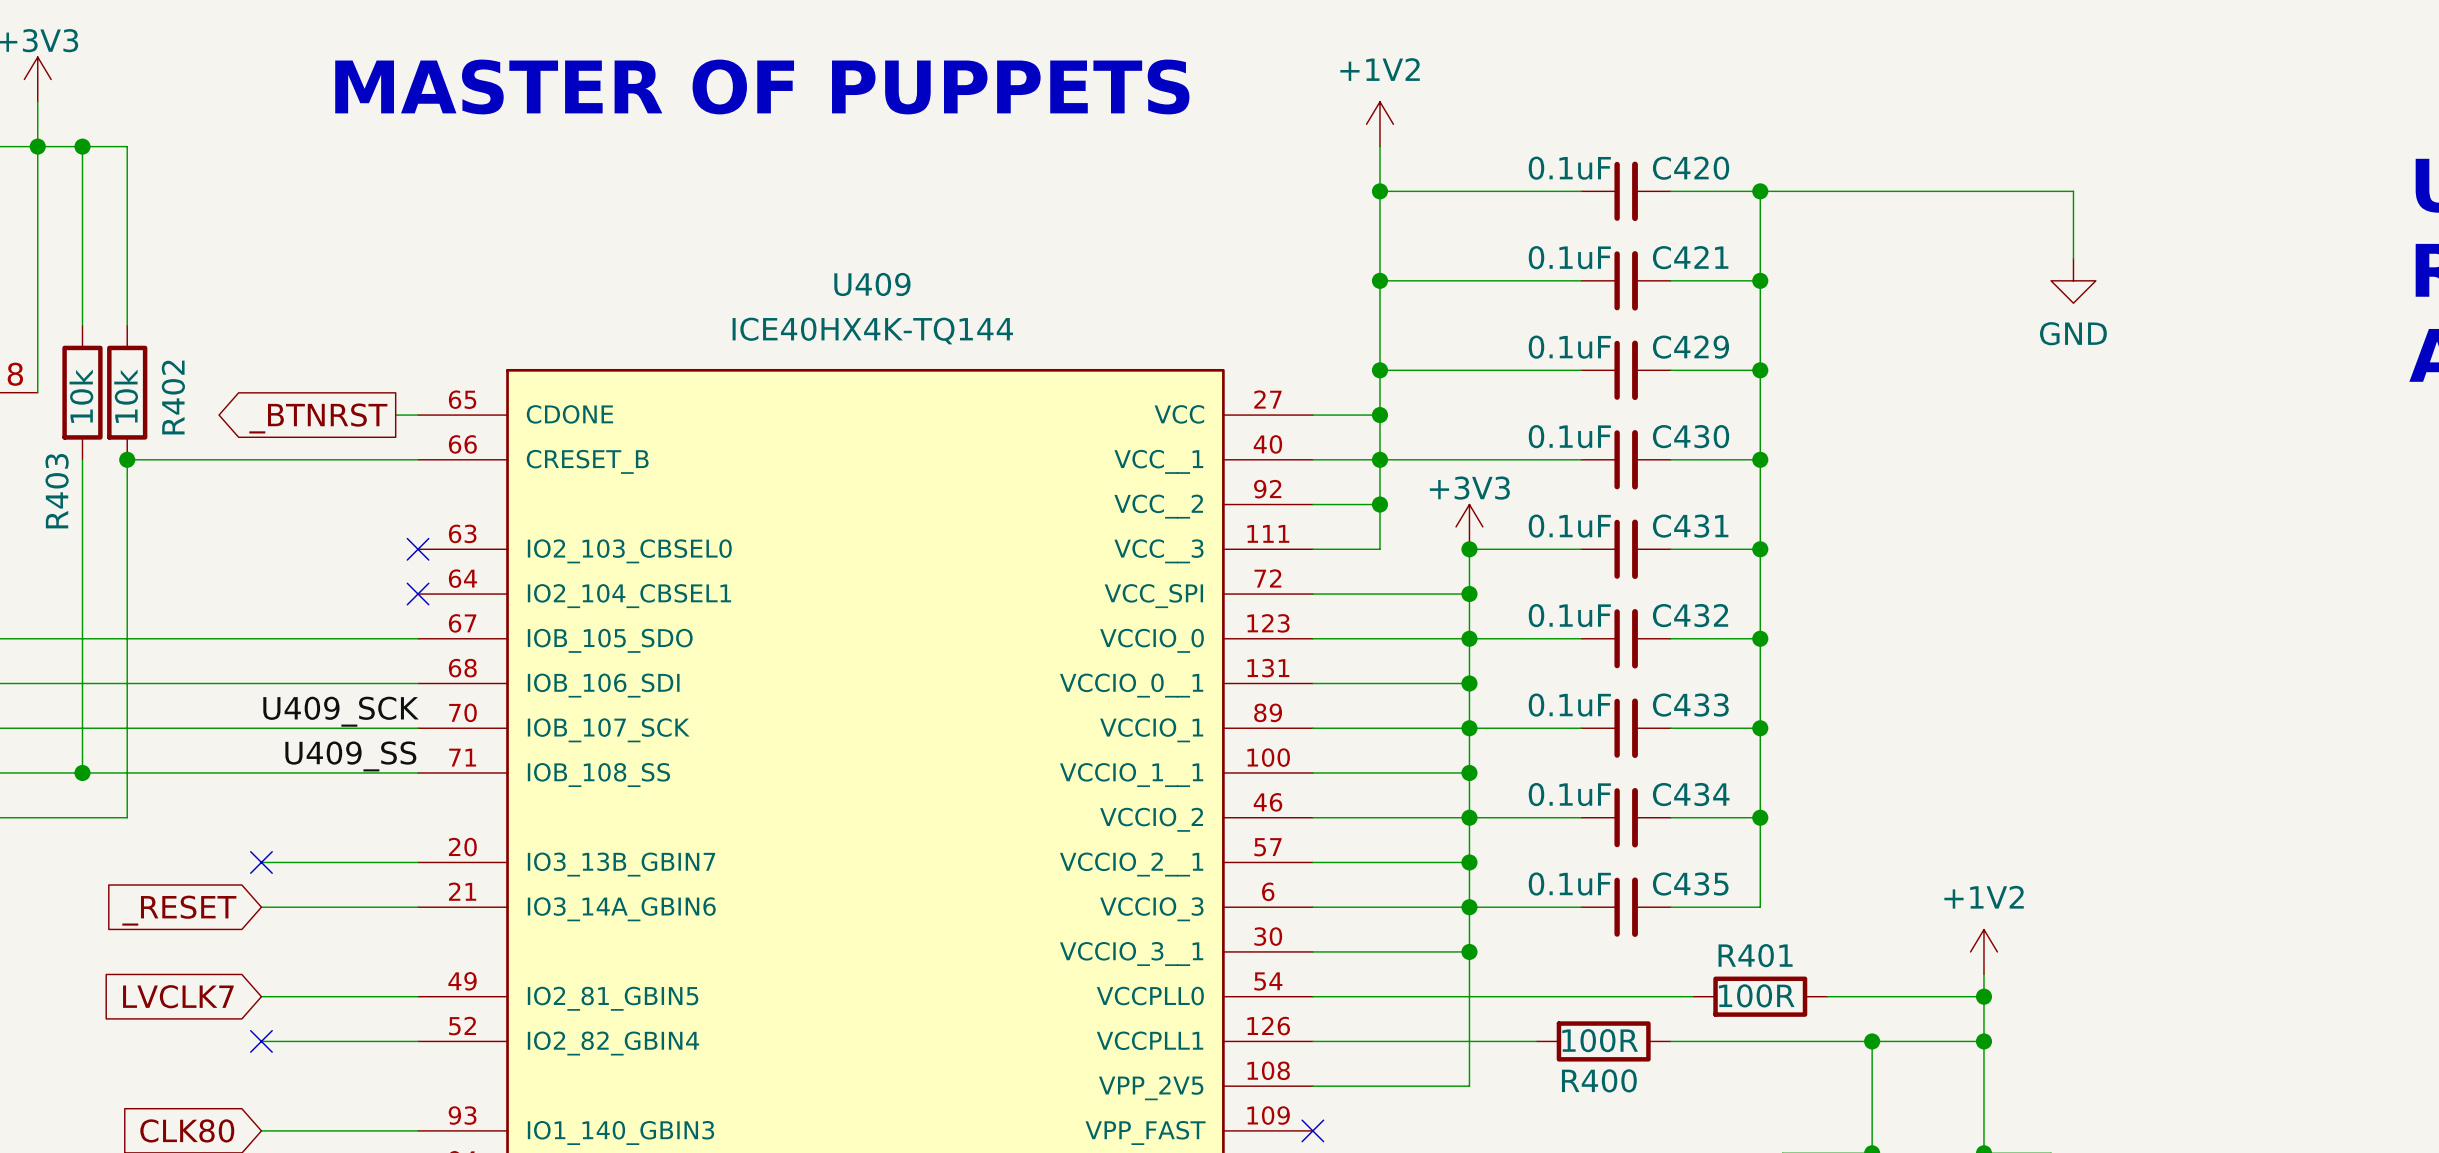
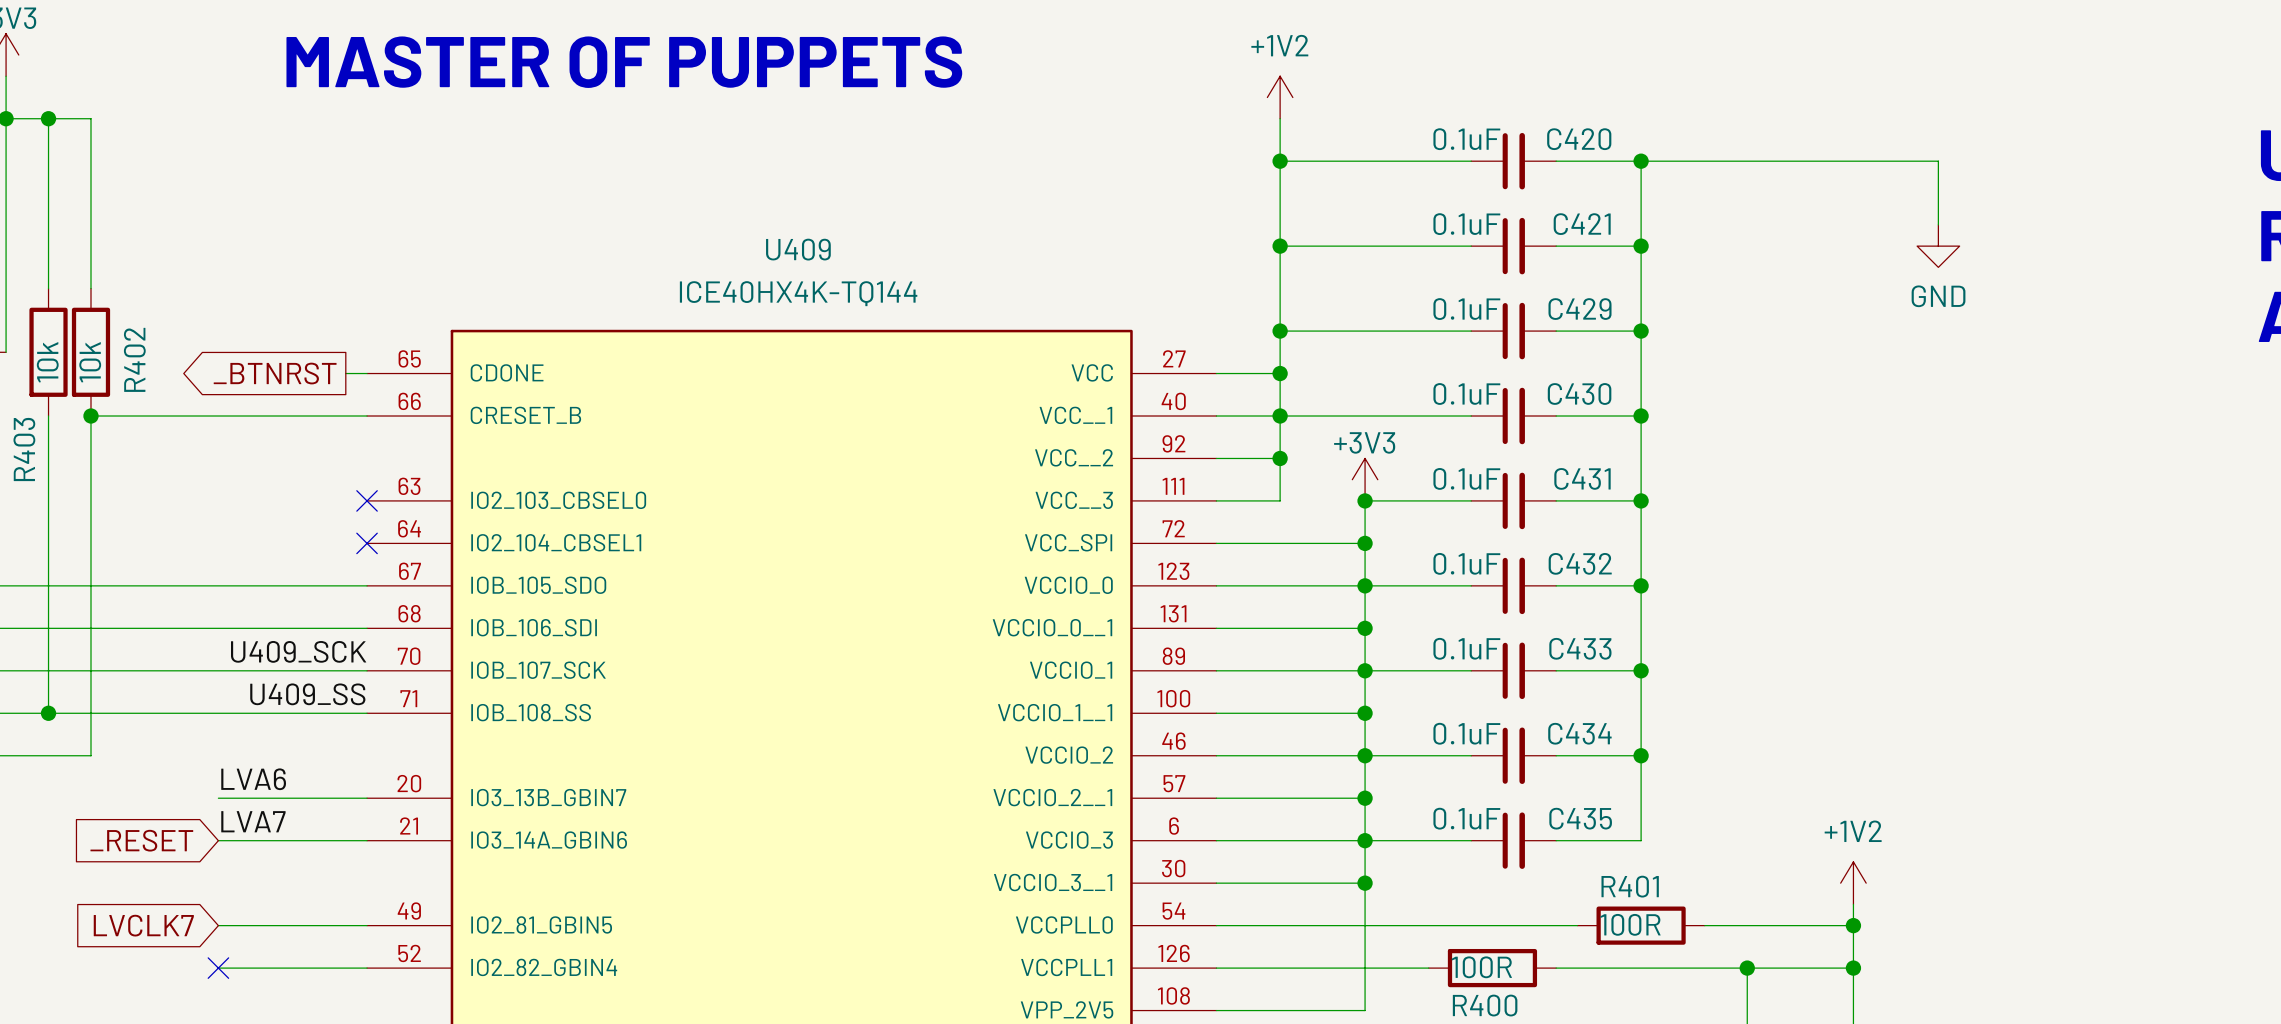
label: none -> LVA6 (253, 779)
no-connect mark: (261, 862) -> none
label: none -> LVA7 (253, 821)

